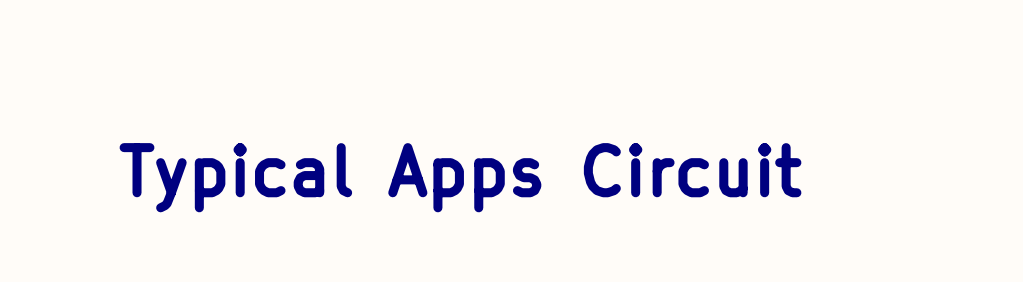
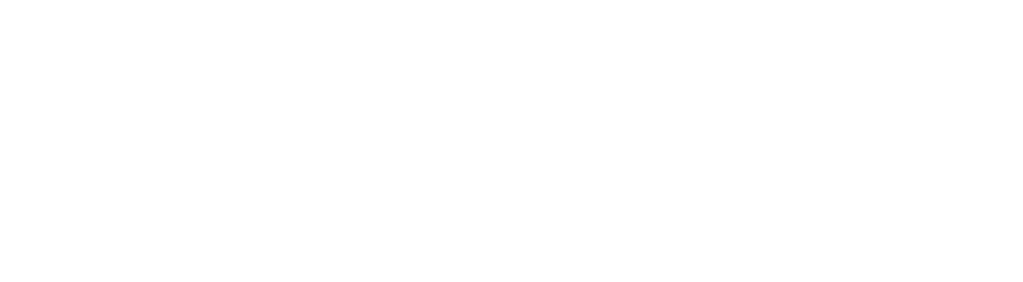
text: Typical Apps Circuit (460, 177) -> none

